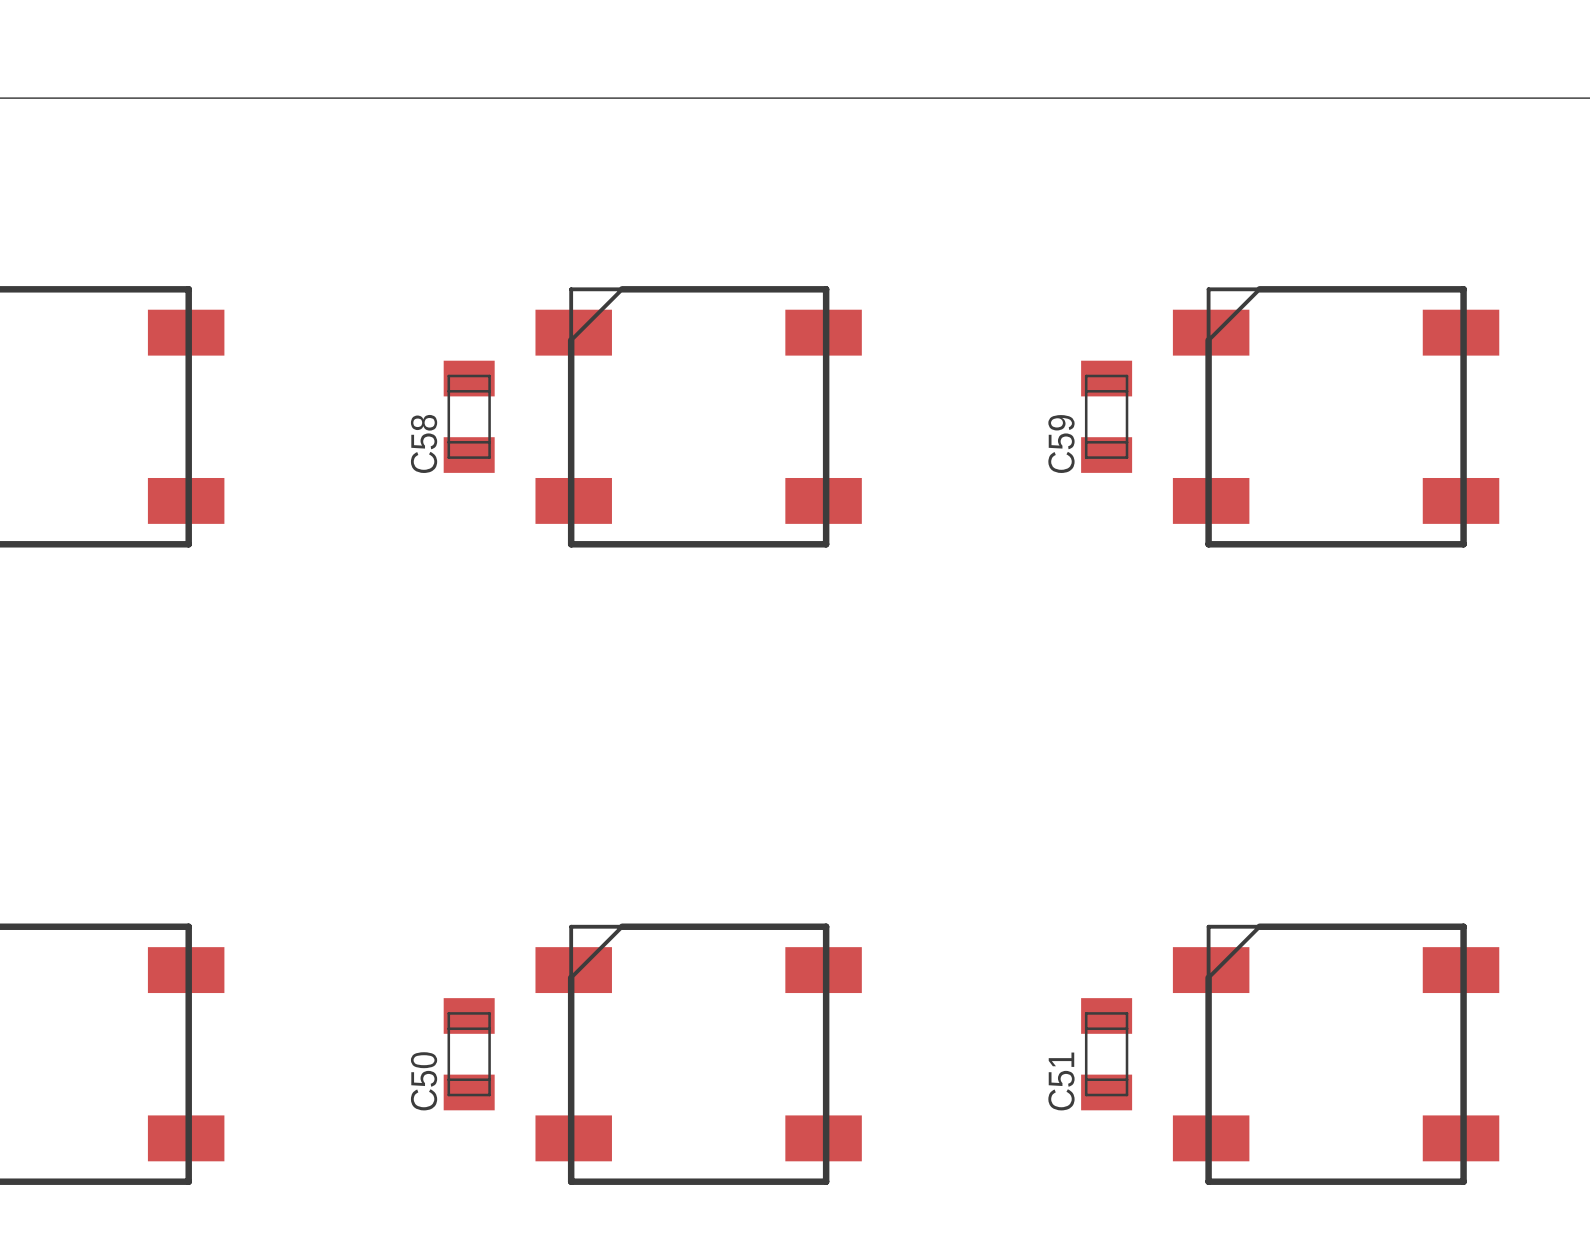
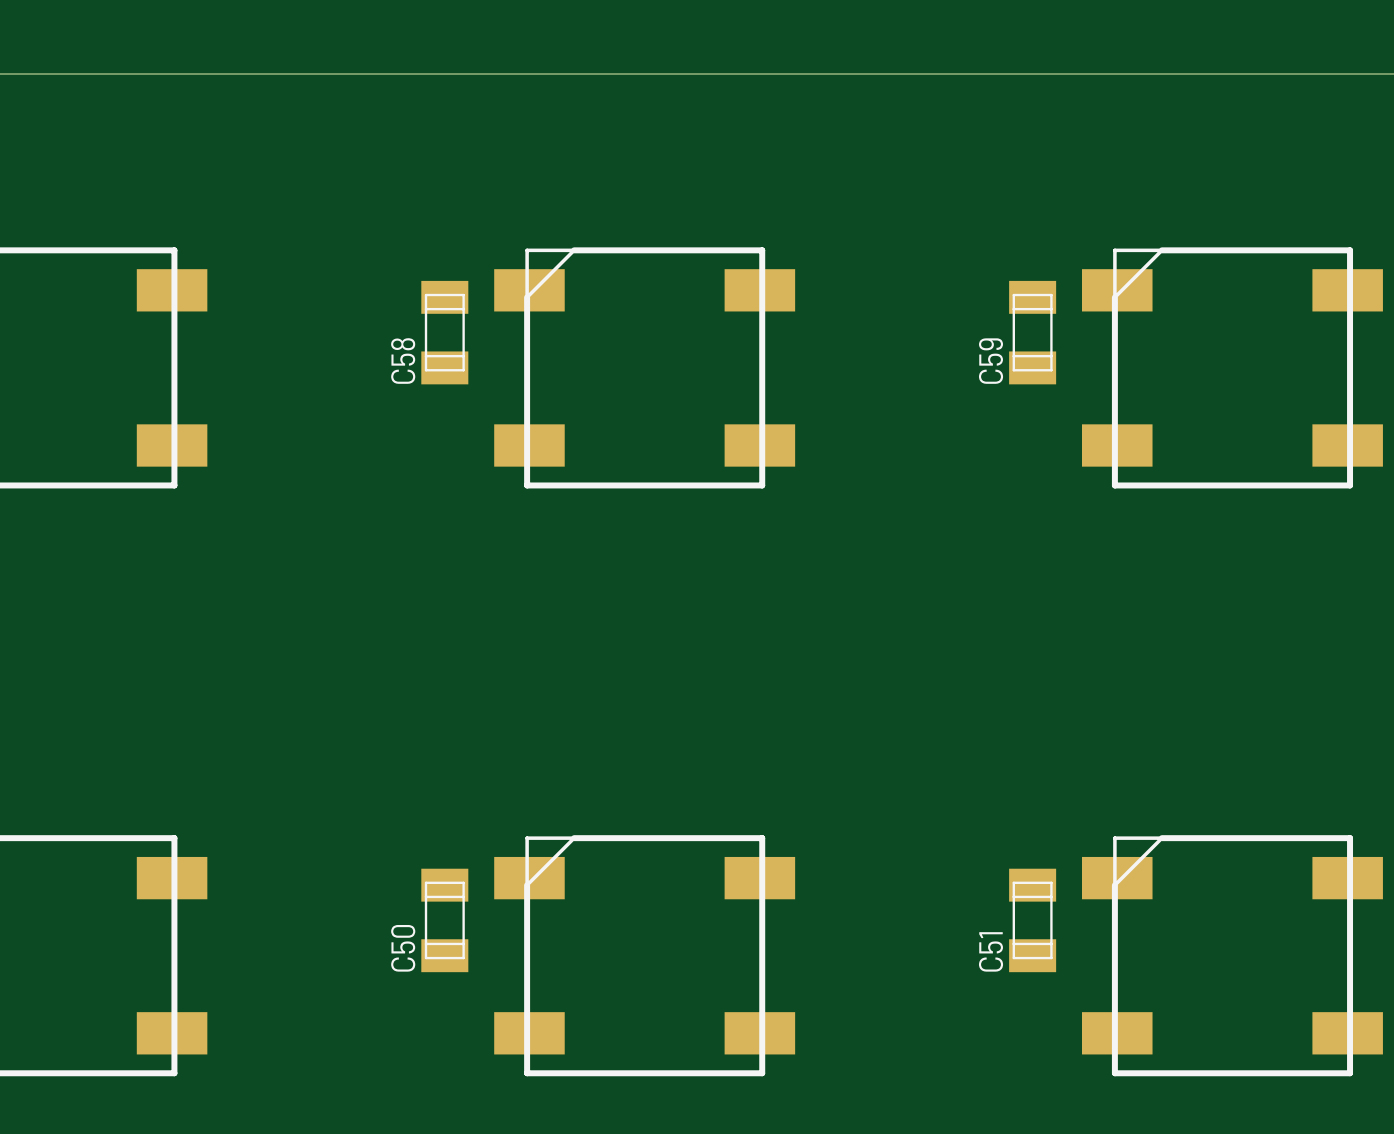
C58 position: (469, 416) -> (444, 332)
C59 position: (1106, 416) -> (1032, 332)
C50 position: (469, 1054) -> (444, 920)
C51 position: (1106, 1054) -> (1032, 920)

